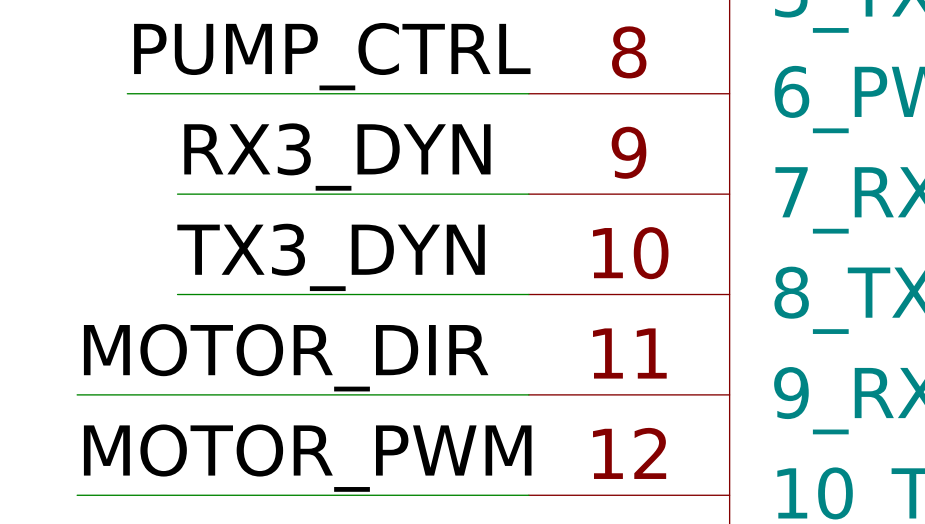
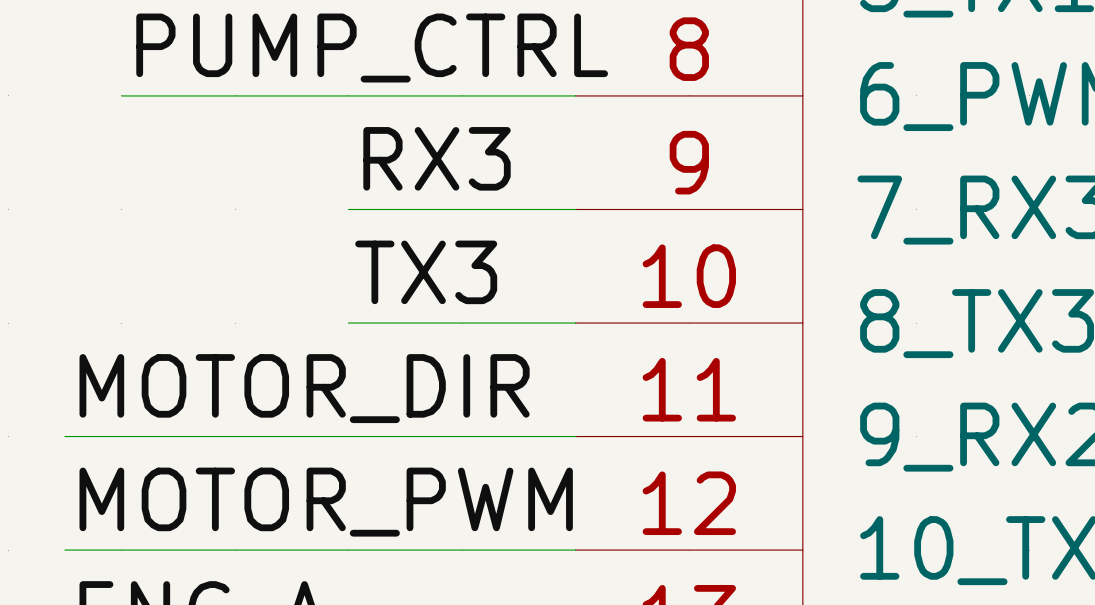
label: none -> RX3 (437, 158)
label: RX3_DYN (337, 157) -> none
wire: (177, 194) (328, 194) -> none
label: none -> TX3 (426, 272)
label: TX3_DYN (331, 257) -> none
wire: (177, 294) (328, 294) -> none

